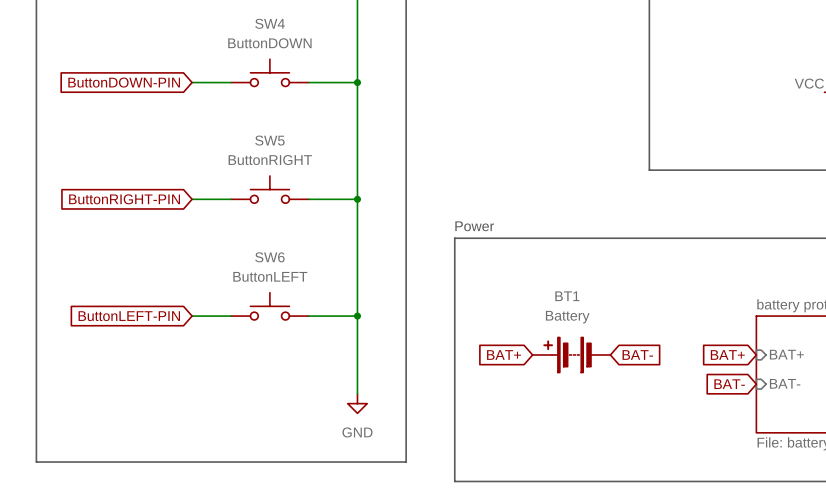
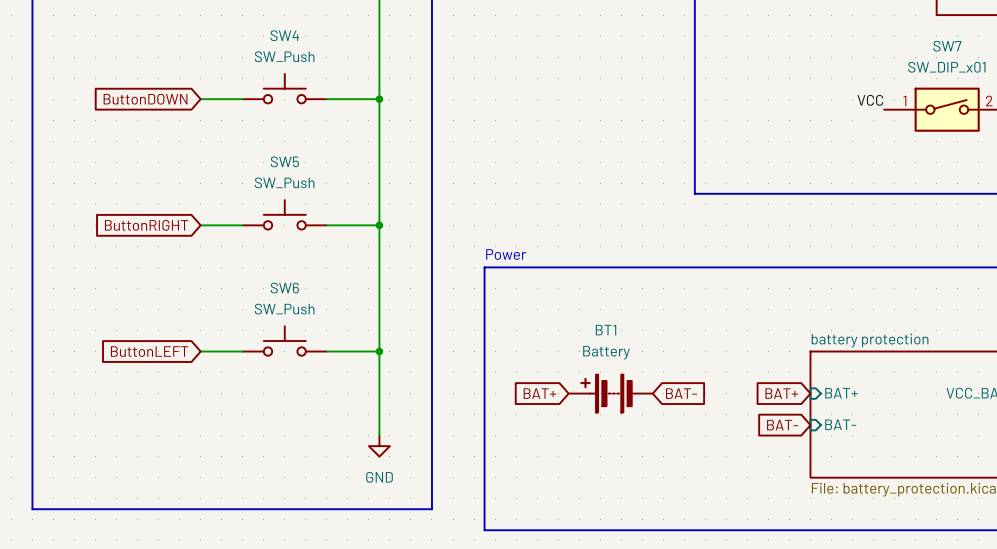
SW4 value: ButtonDOWN (269, 43) -> SW_Push (284, 56)
global label: ButtonDOWN-PIN (124, 82) -> ButtonDOWN (145, 99)
SW5 value: ButtonRIGHT (270, 160) -> SW_Push (284, 182)
global label: ButtonRIGHT-PIN (124, 199) -> ButtonRIGHT (146, 225)
SW6 value: ButtonLEFT (270, 276) -> SW_Push (284, 309)
global label: ButtonLEFT-PIN (129, 316) -> ButtonLEFT (149, 351)

